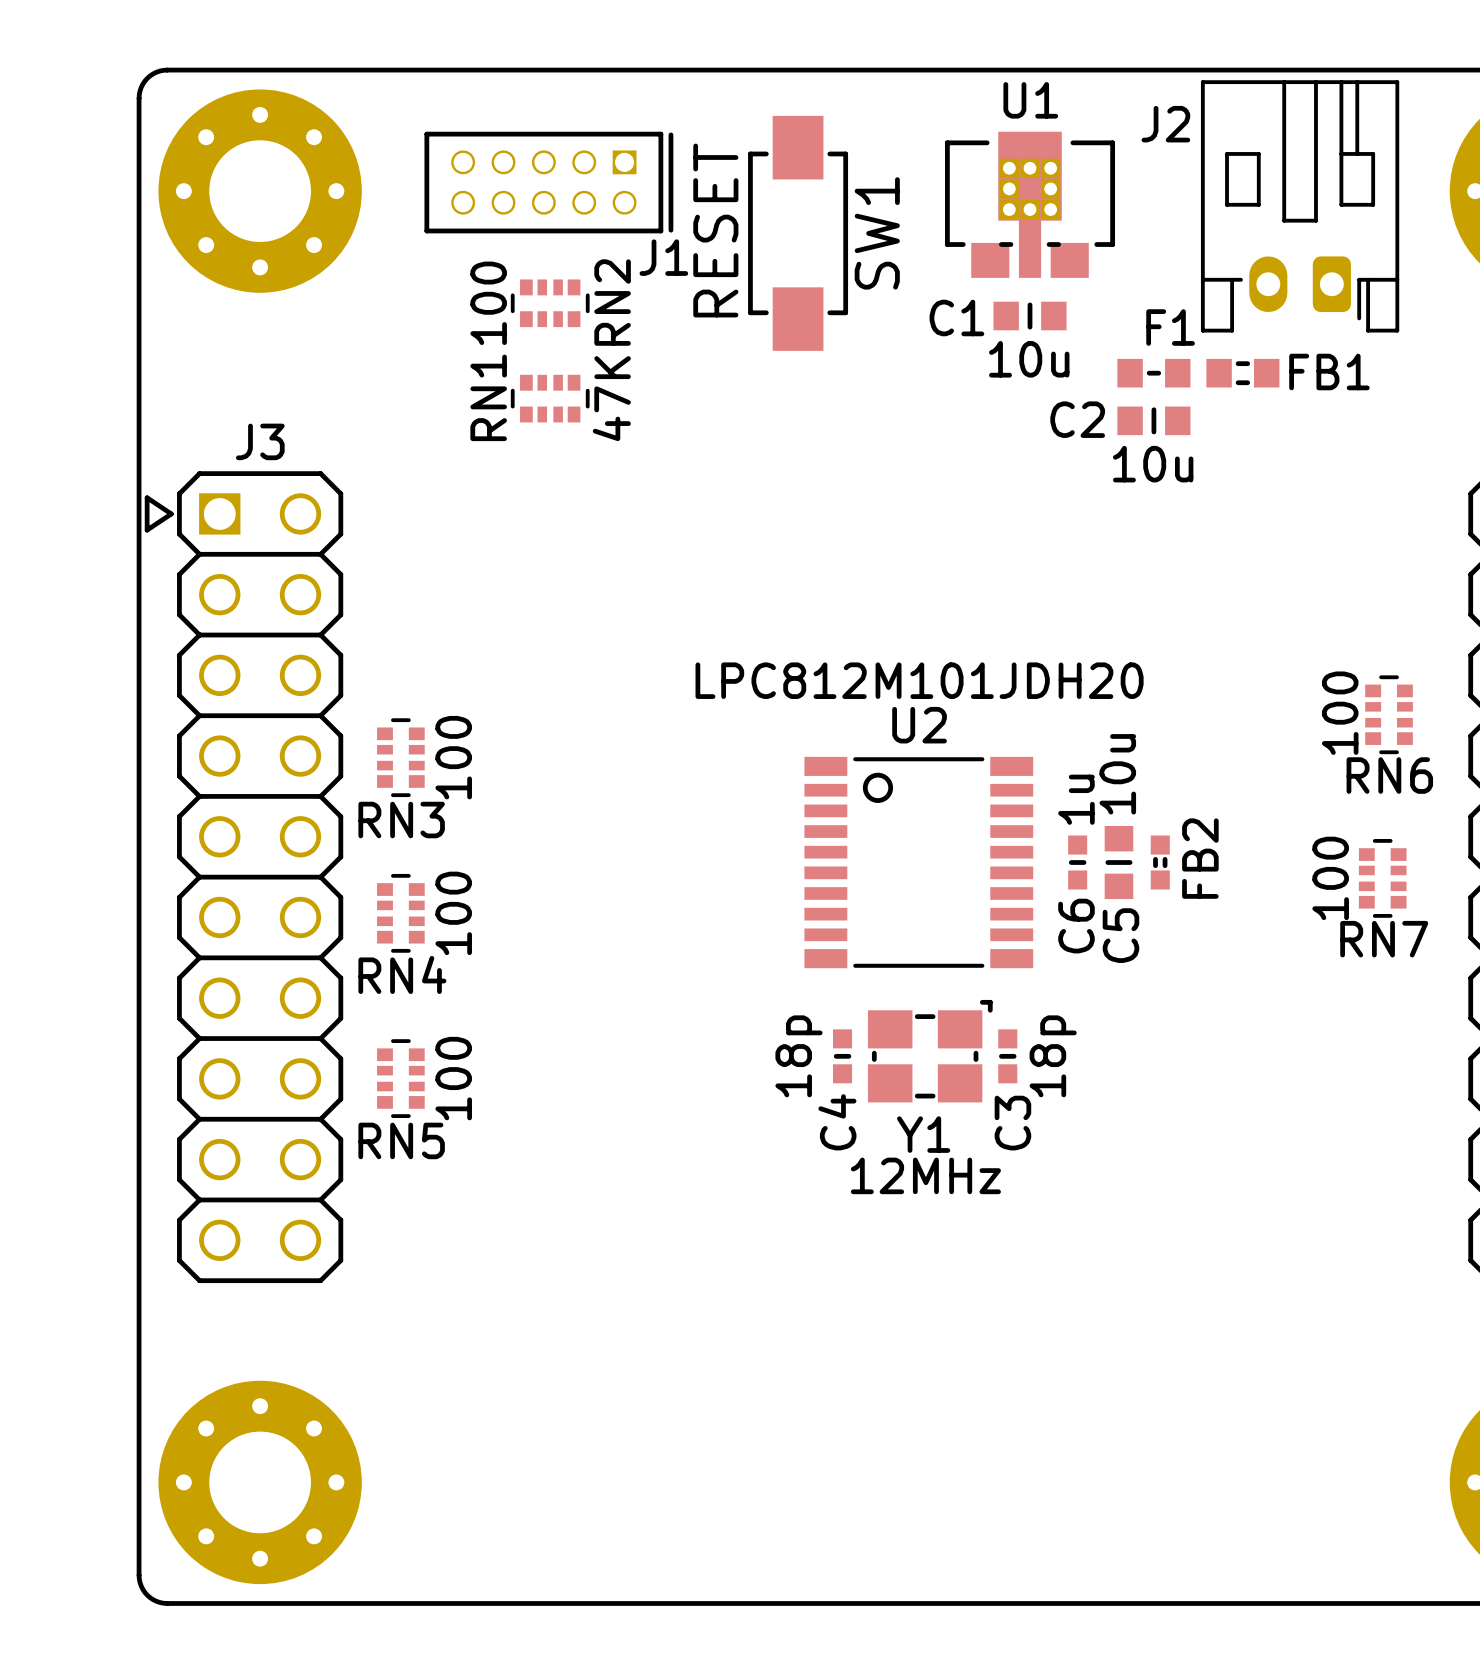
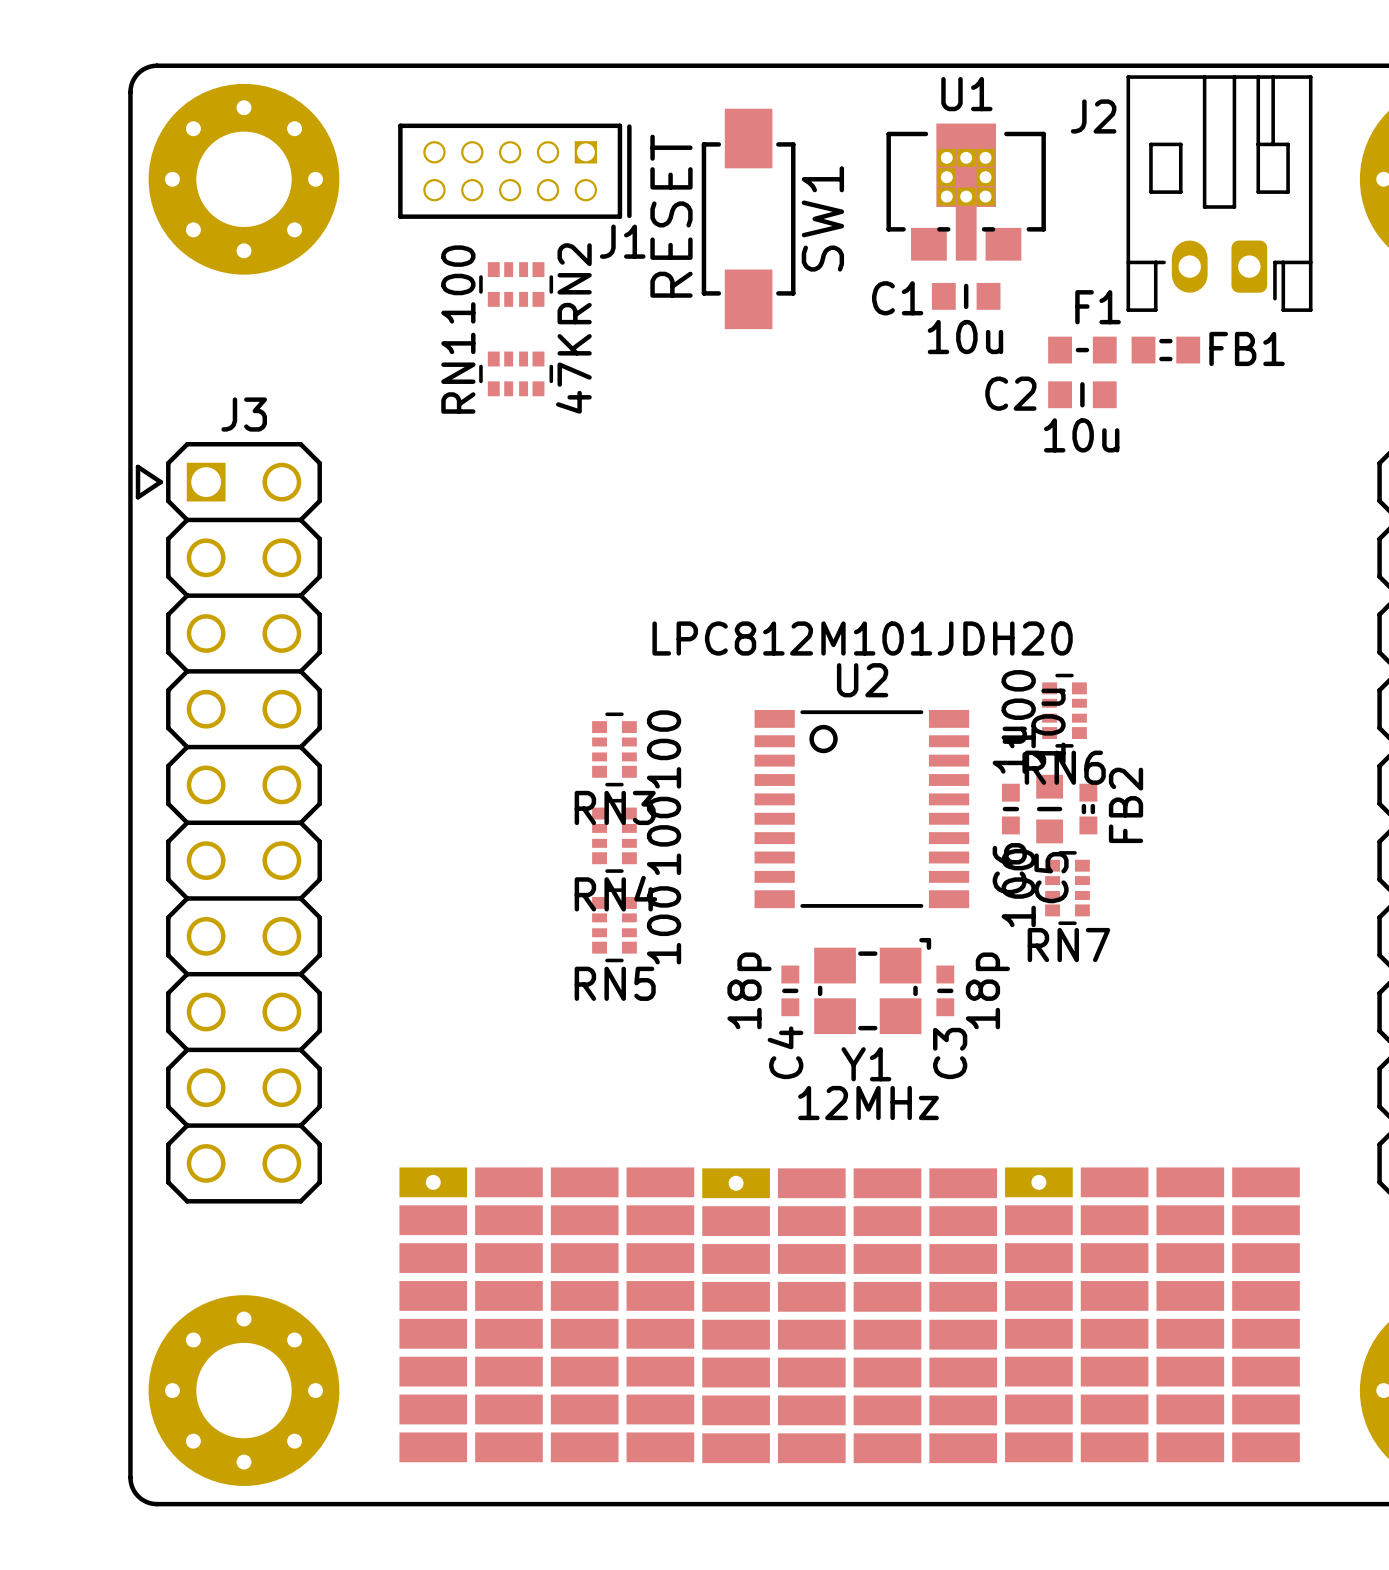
RN6 position: (1389, 714) -> (1064, 710)
RN3 position: (400, 757) -> (614, 749)
RN7 position: (1382, 878) -> (1067, 888)
RN4 position: (400, 913) -> (614, 835)
RN5 position: (400, 1078) -> (614, 925)
part: none -> (546, 1314)
part: none -> (1152, 1314)
part: none -> (849, 1315)

